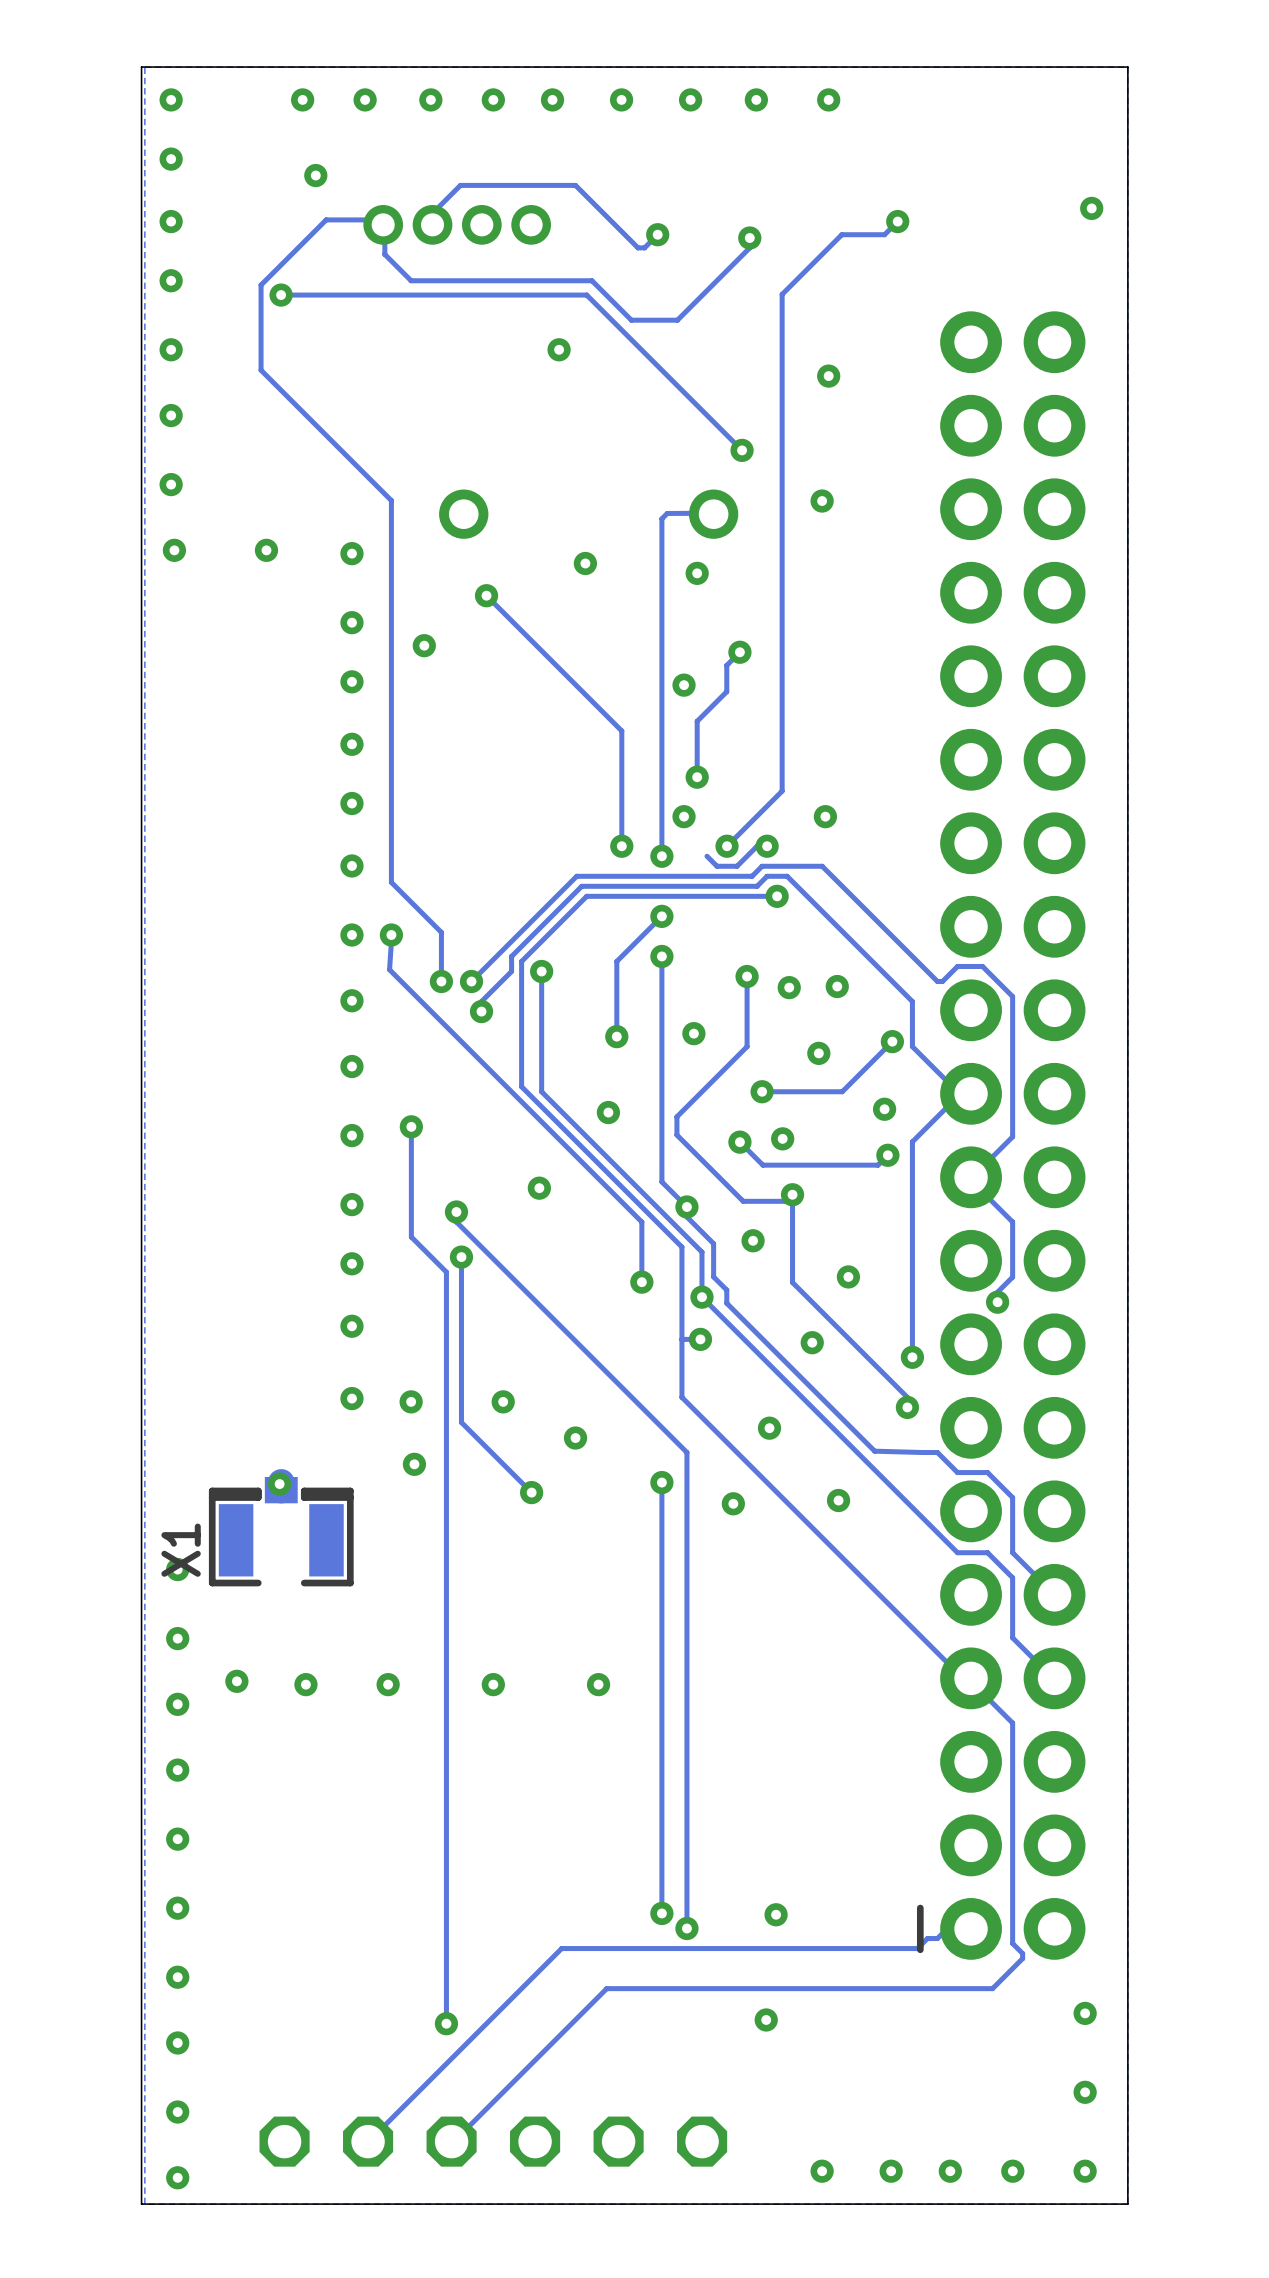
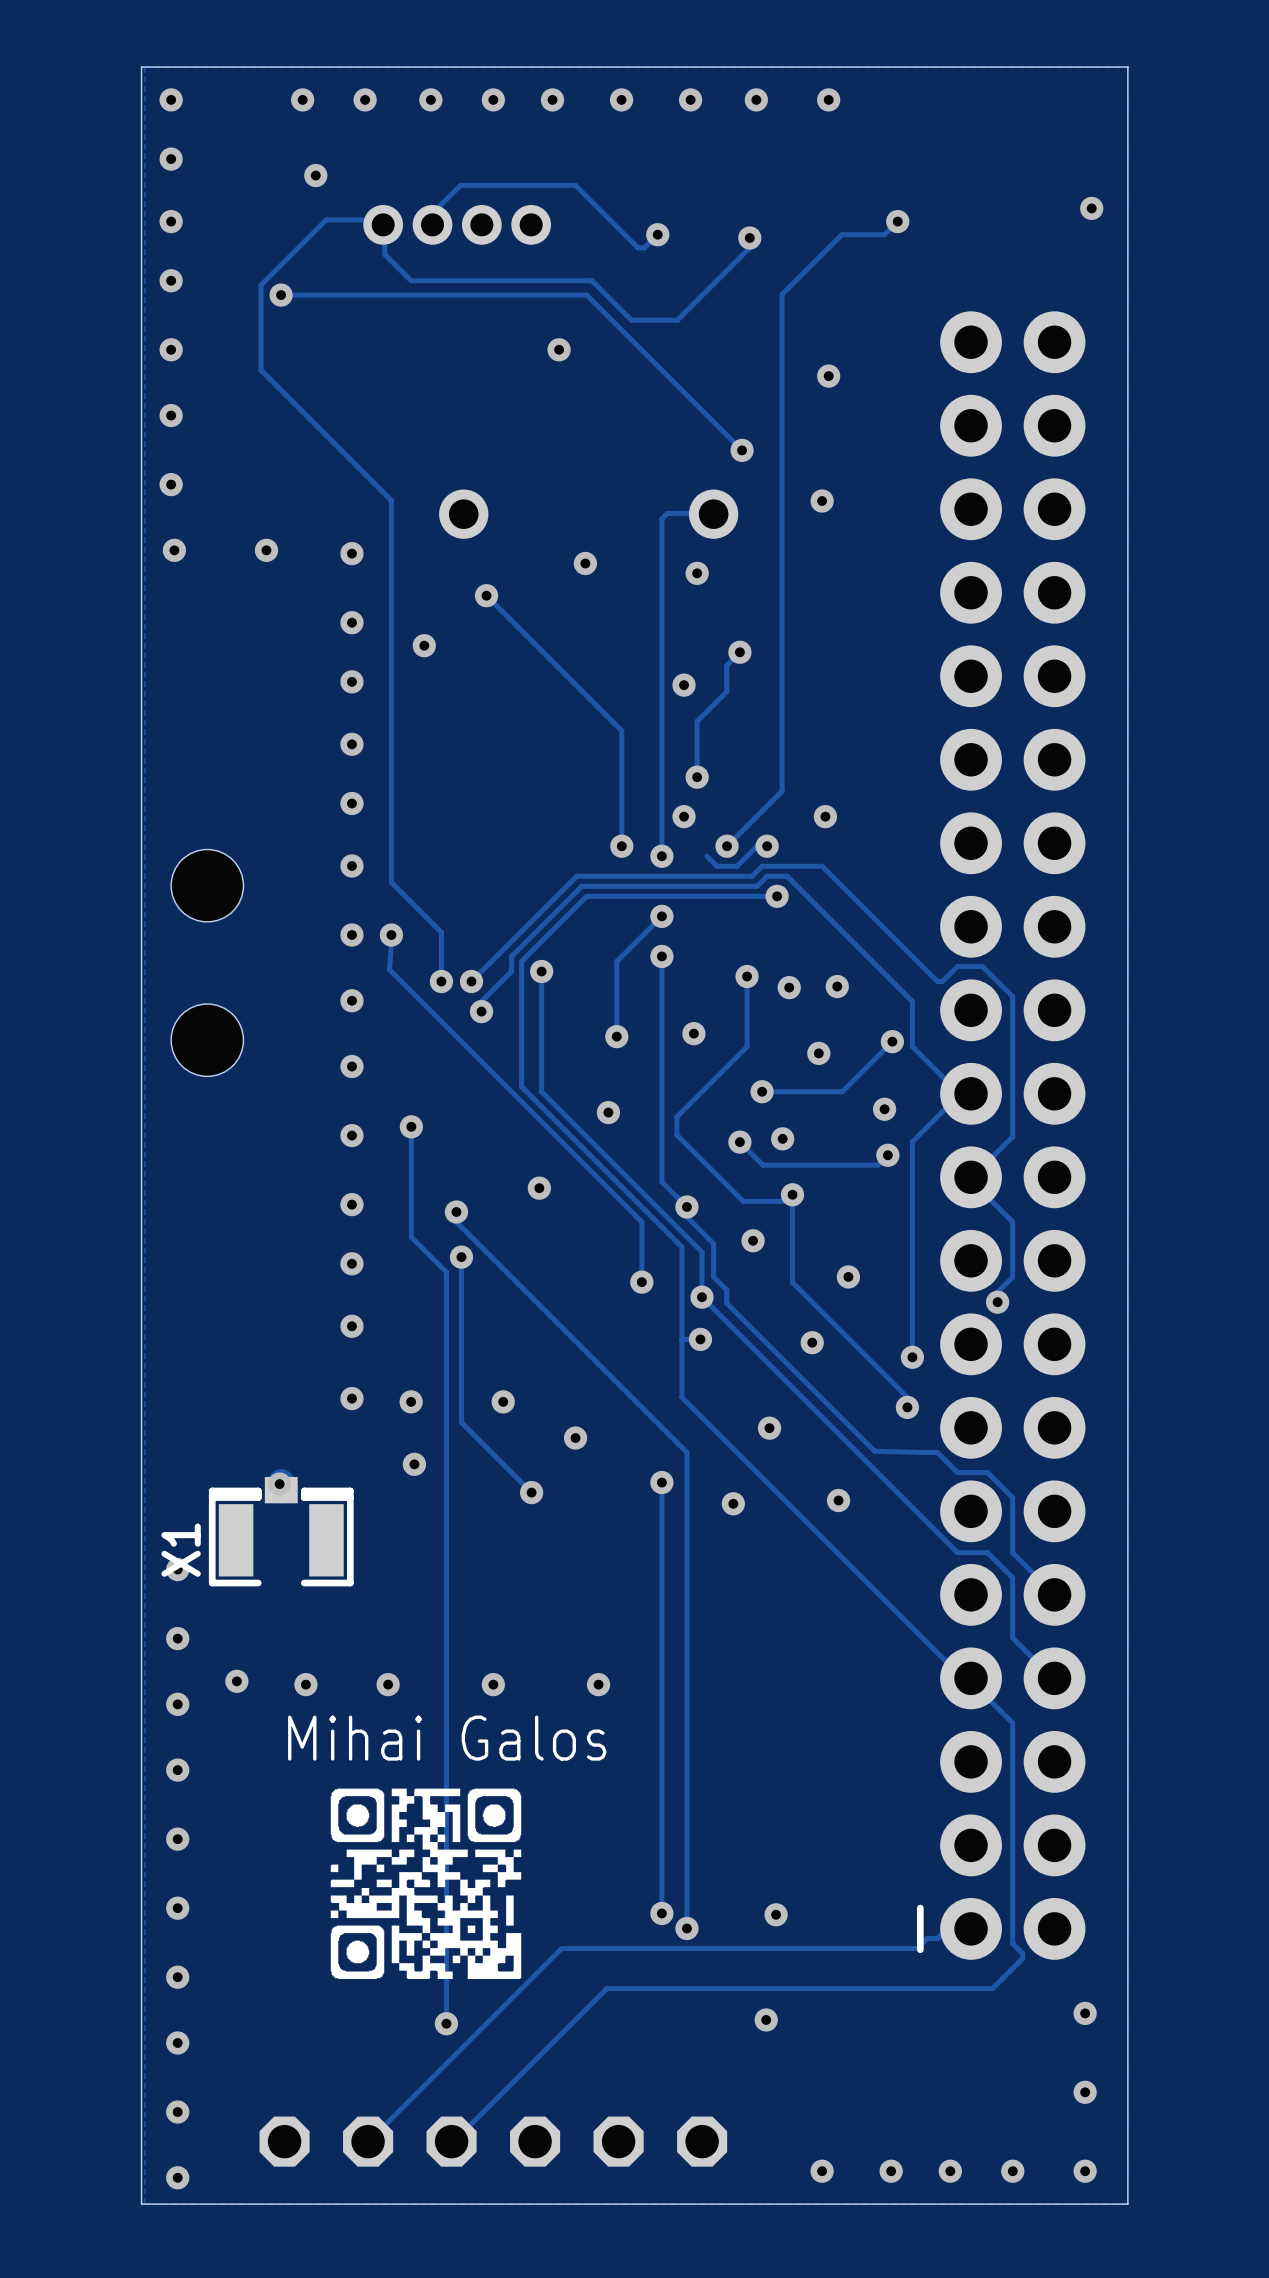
hole: none -> (207, 885)
hole: none -> (207, 1040)
text: none -> Mihai Galos (447, 1738)
drawing: none -> [330, 1788, 522, 1980]

